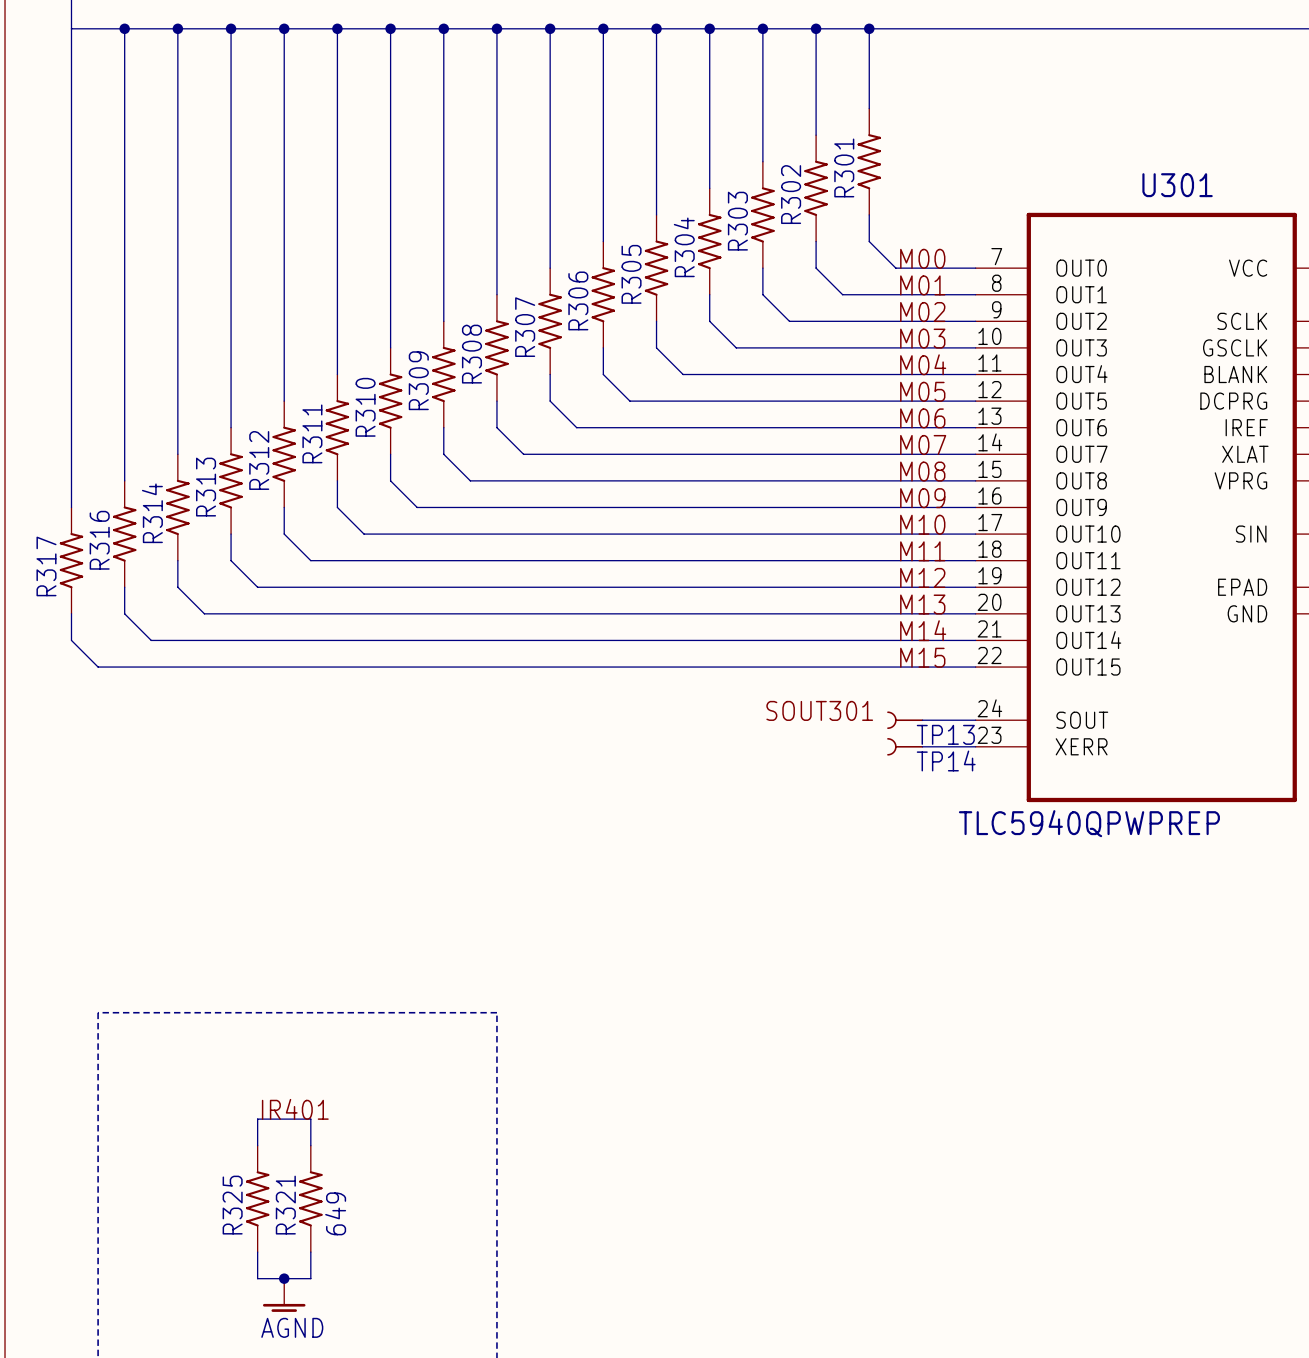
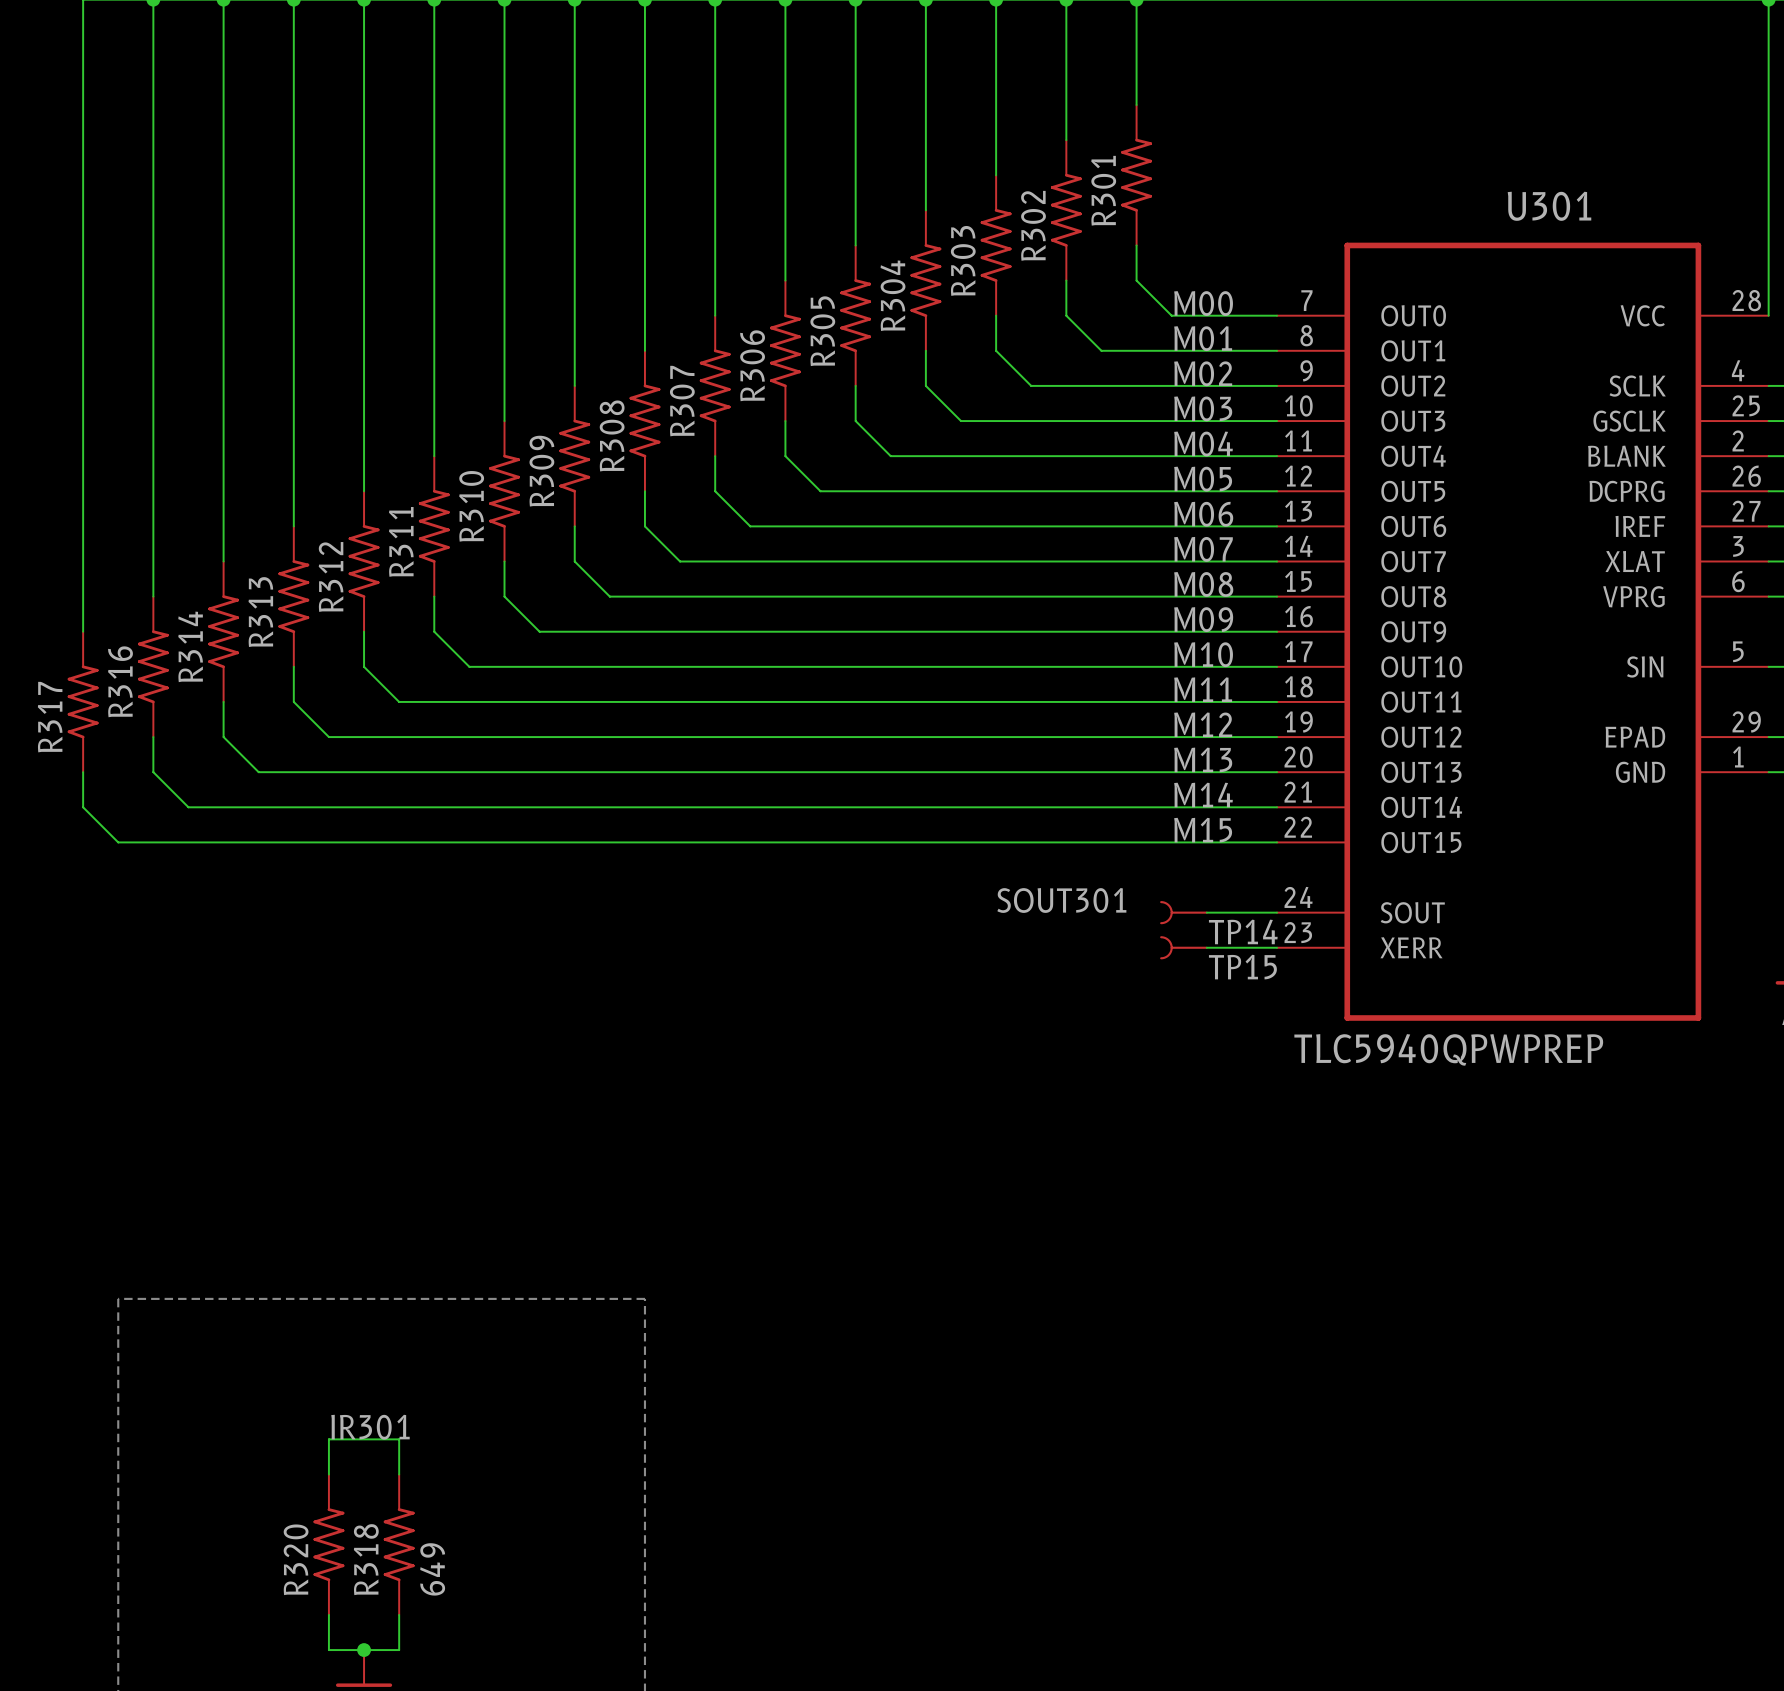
TP13 name: TP13 (945, 734) -> TP14 (1243, 931)
TP14 name: TP14 (946, 760) -> TP15 (1242, 967)
label: IR401 (295, 1109) -> IR301 (370, 1427)
R325 name: R325 (232, 1205) -> R320 (296, 1559)
R321 name: R321 (285, 1205) -> R318 (366, 1559)

